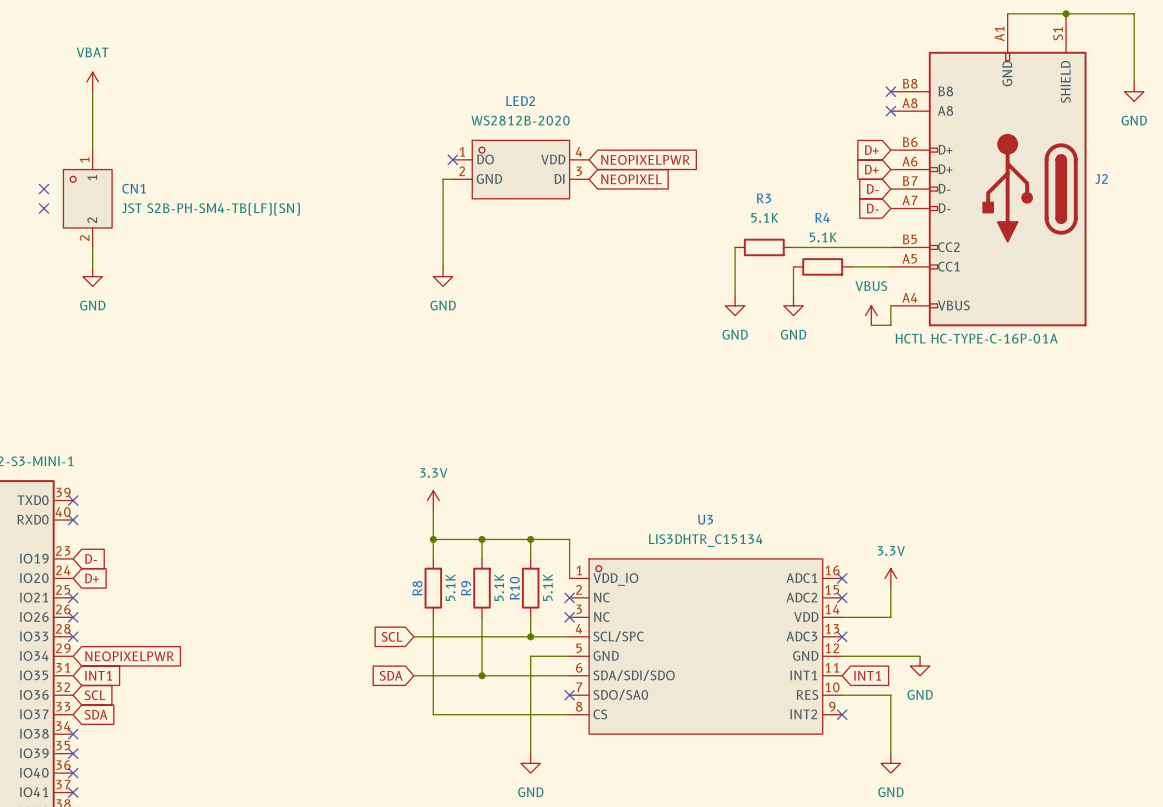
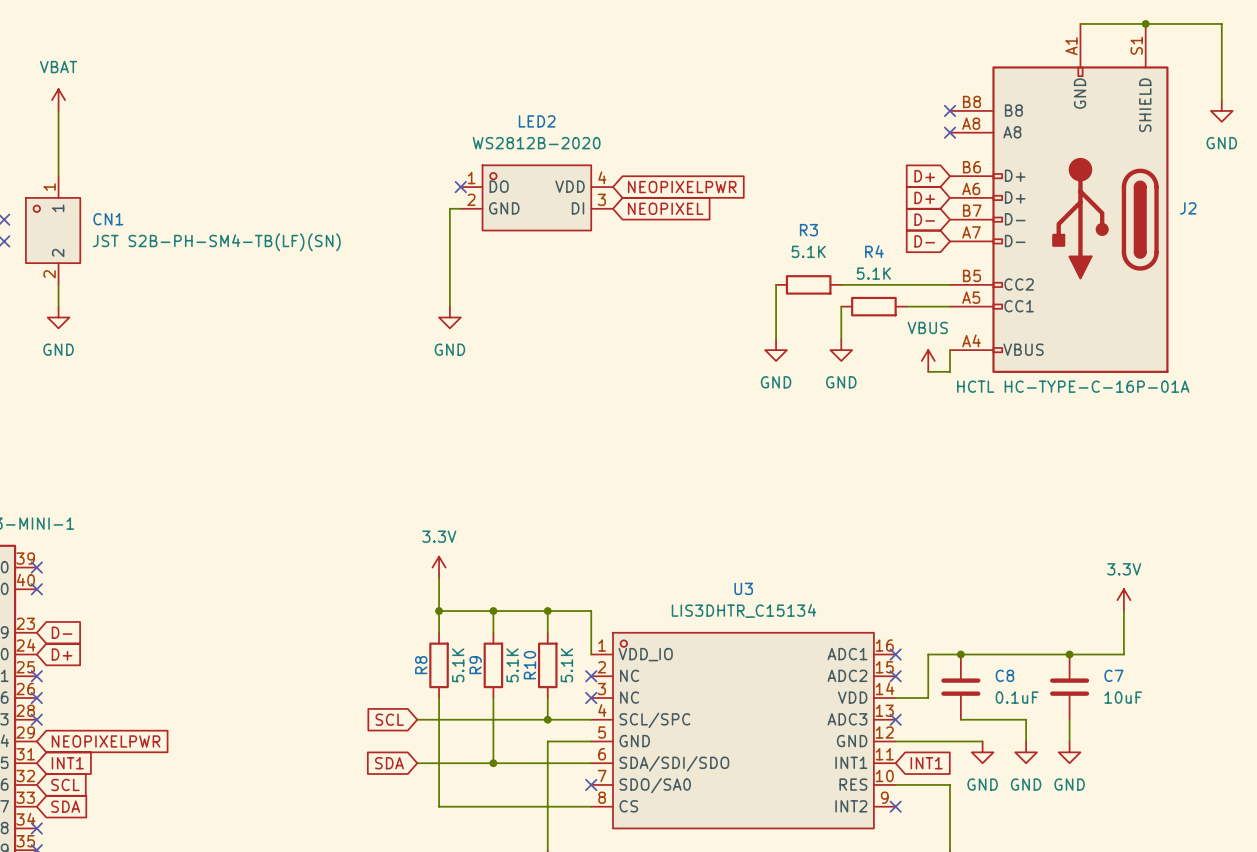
power symbol position: 3.3V (890, 578) -> 3.3V (1123, 600)
junction: none -> (960, 654)
junction: none -> (1069, 654)
wire: (890, 588) (890, 617) (871, 617) -> (1123, 611) (1123, 654) (928, 654) (928, 697)
C8: none -> 0.1uF (960, 687)
C7: none -> 10uF (1069, 687)
wire: none -> (960, 719) (1026, 719) (1026, 741)
wire: none -> (1069, 719) (1069, 741)
power symbol: none -> GND (1026, 752)
power symbol: none -> GND (1069, 752)

